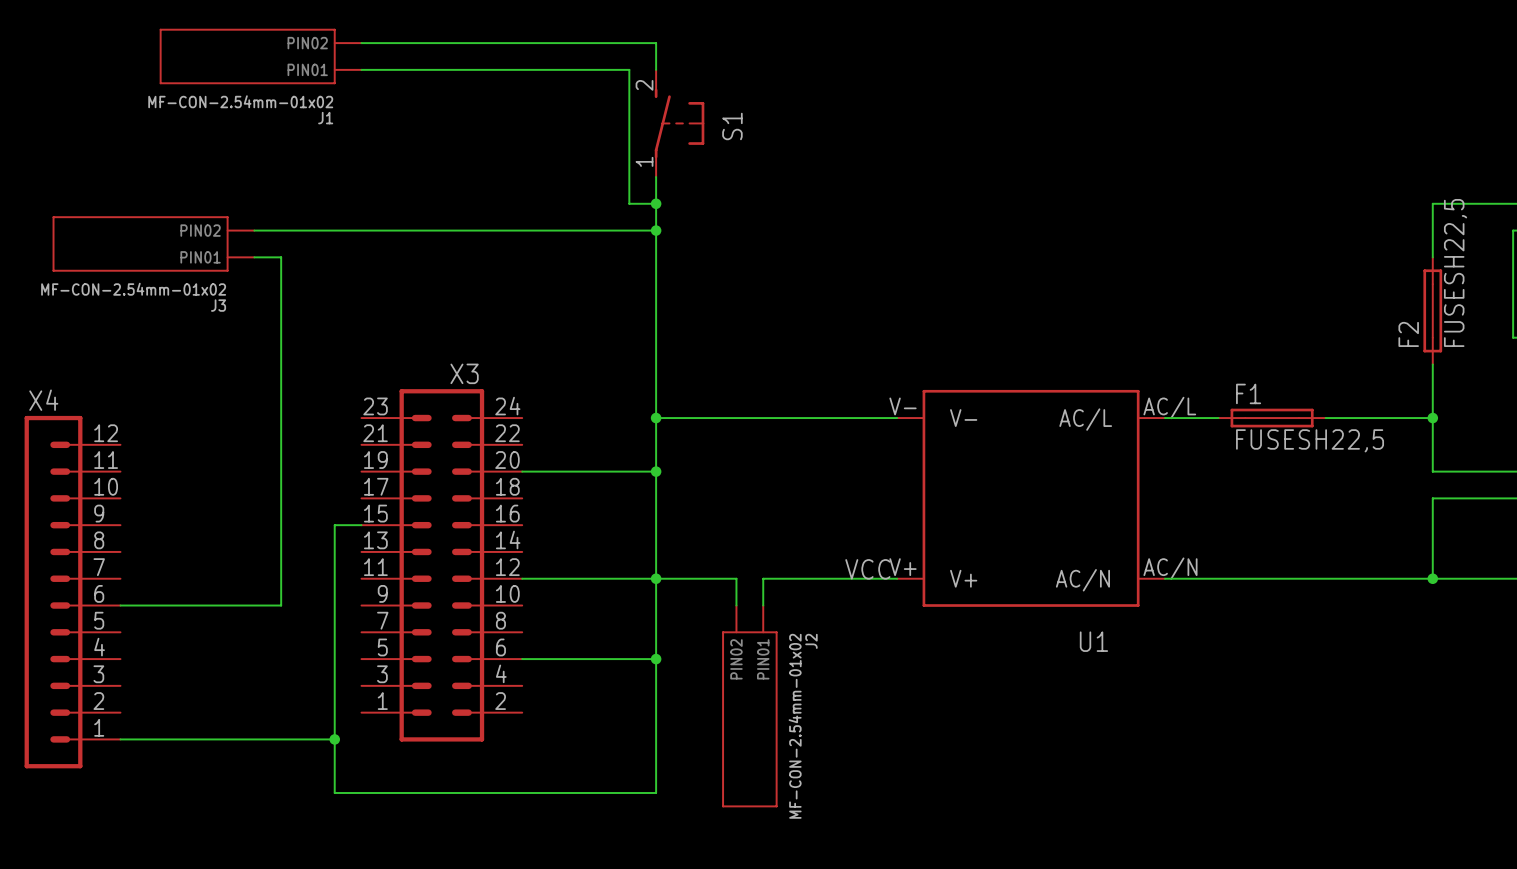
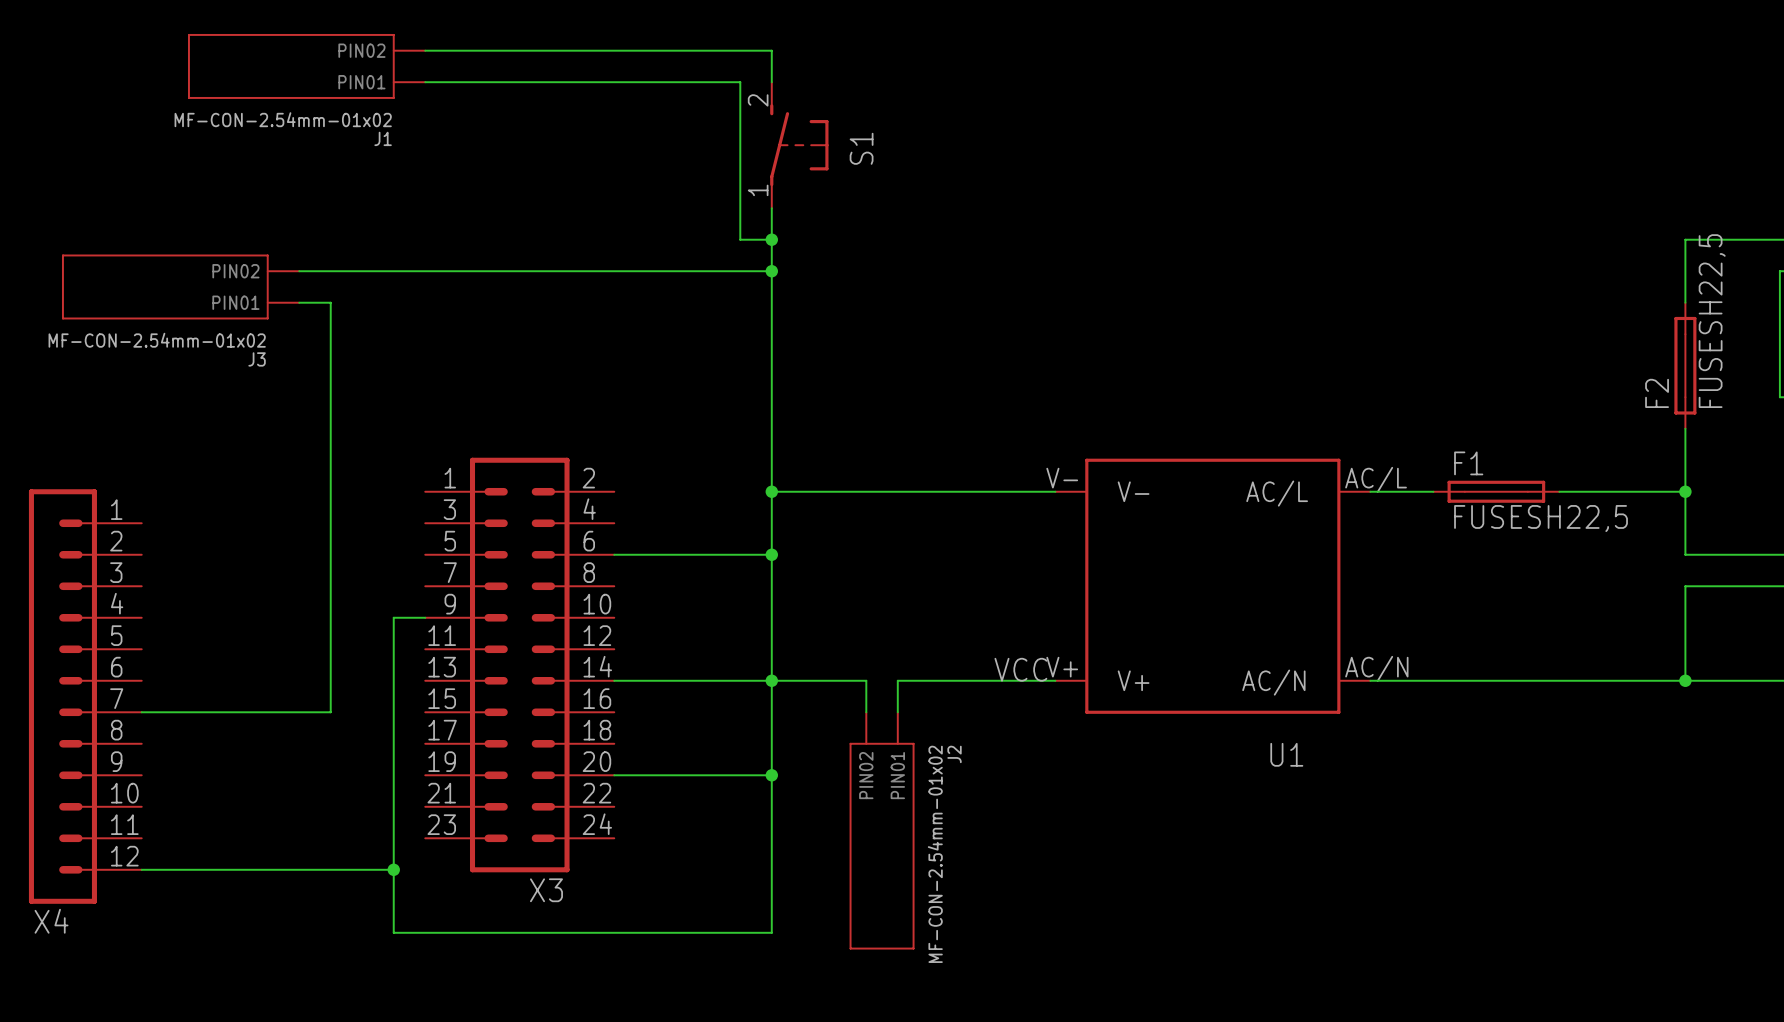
X3 flip: as is (441, 565) -> up-down (519, 665)
X4 flip: as is (53, 592) -> up-down (62, 696)

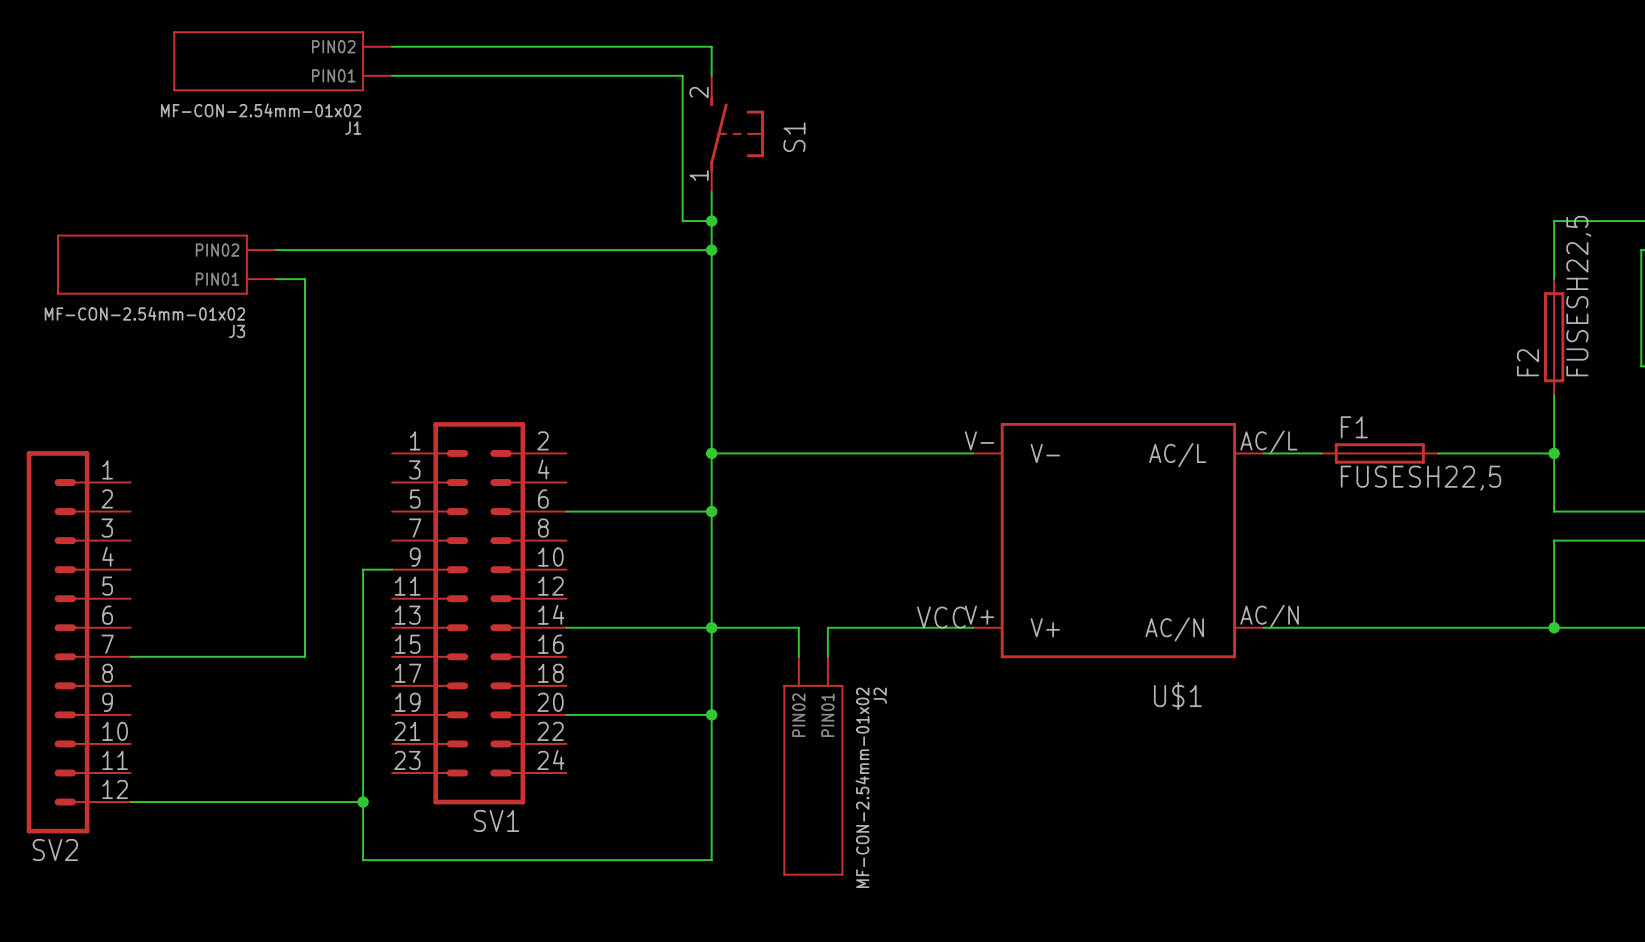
U1 name: U1 (1286, 754) -> U$1 (1177, 696)
X3 name: X3 (546, 890) -> SV1 (496, 820)
X4 name: X4 (51, 921) -> SV2 (55, 849)

